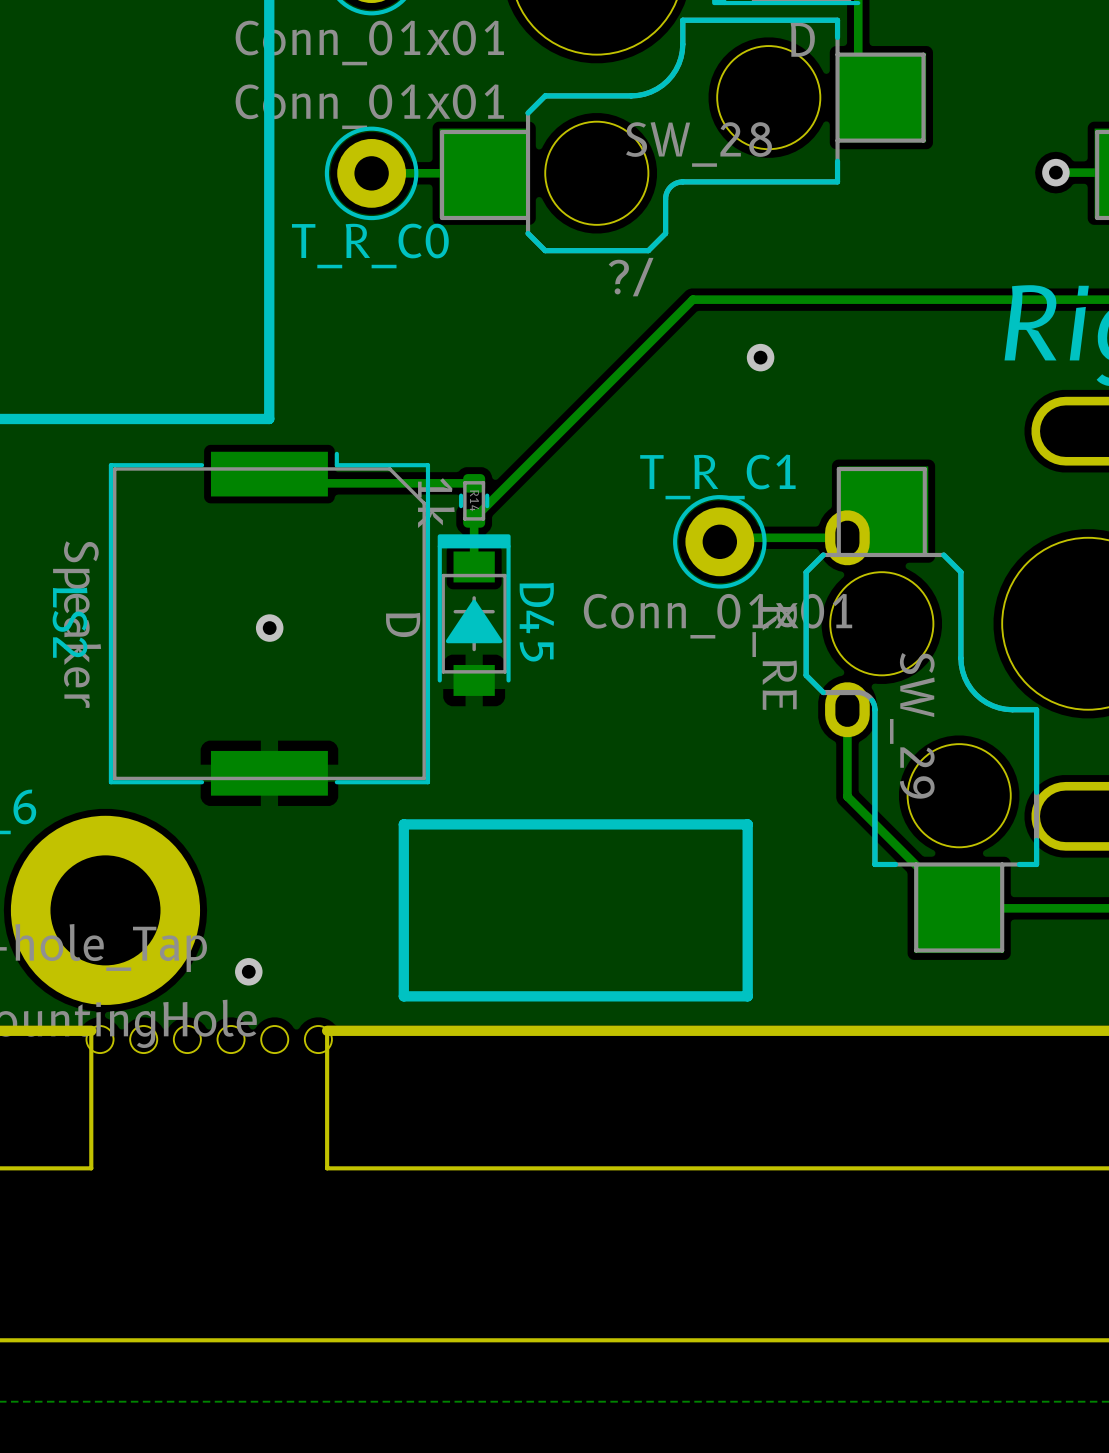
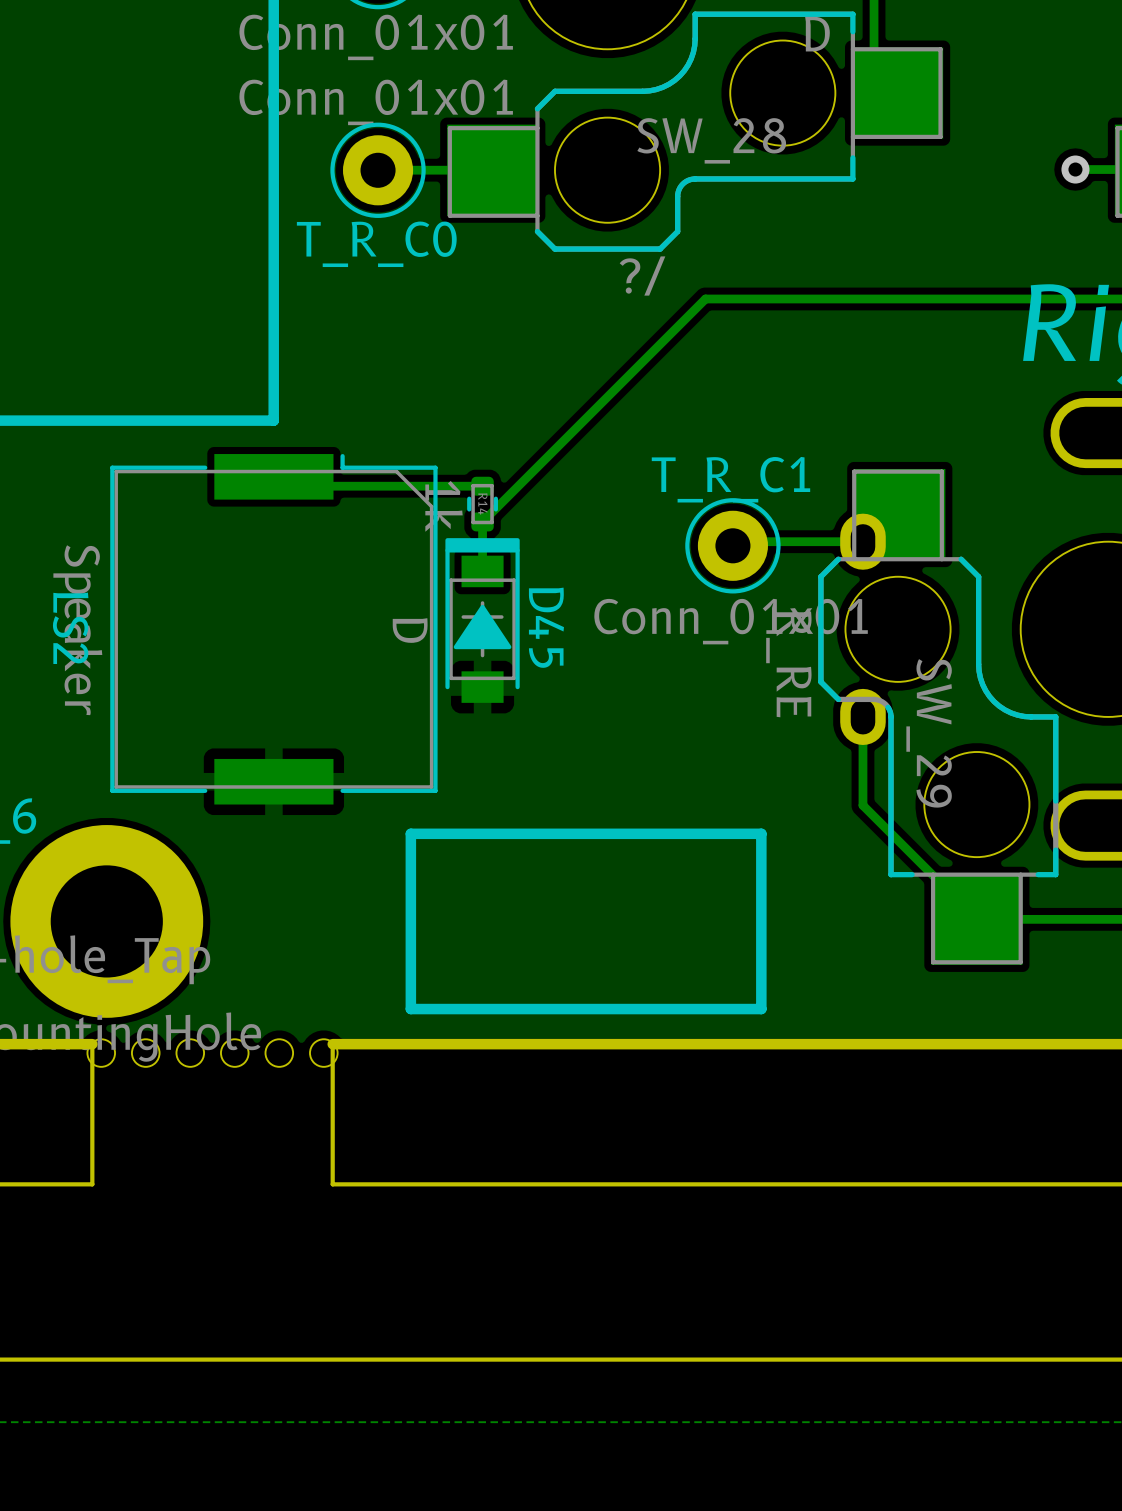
via: (760, 357) -> none
via: (269, 628) -> none
via: (248, 971) -> none

